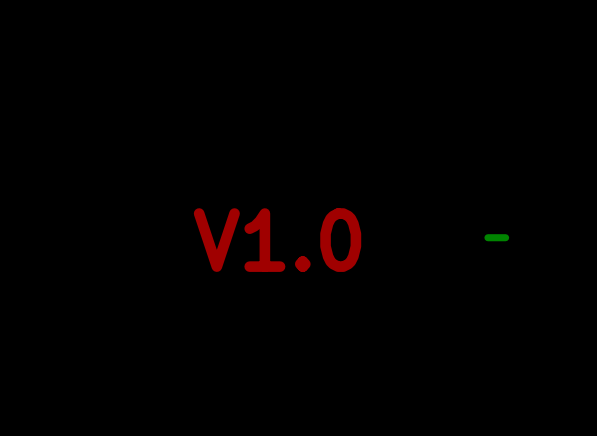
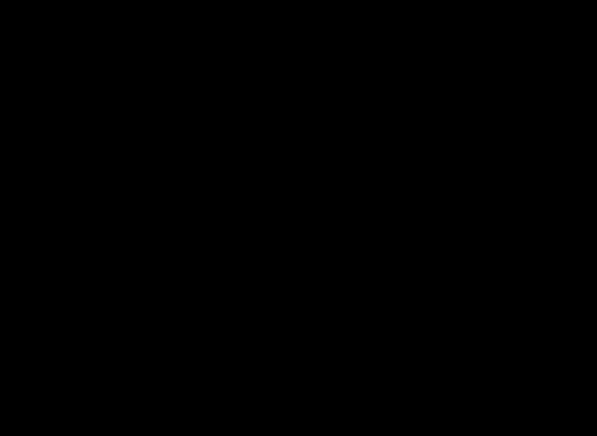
bottom track: (487, 237) (505, 237) -> none
text: V1.0 (277, 240) -> none

